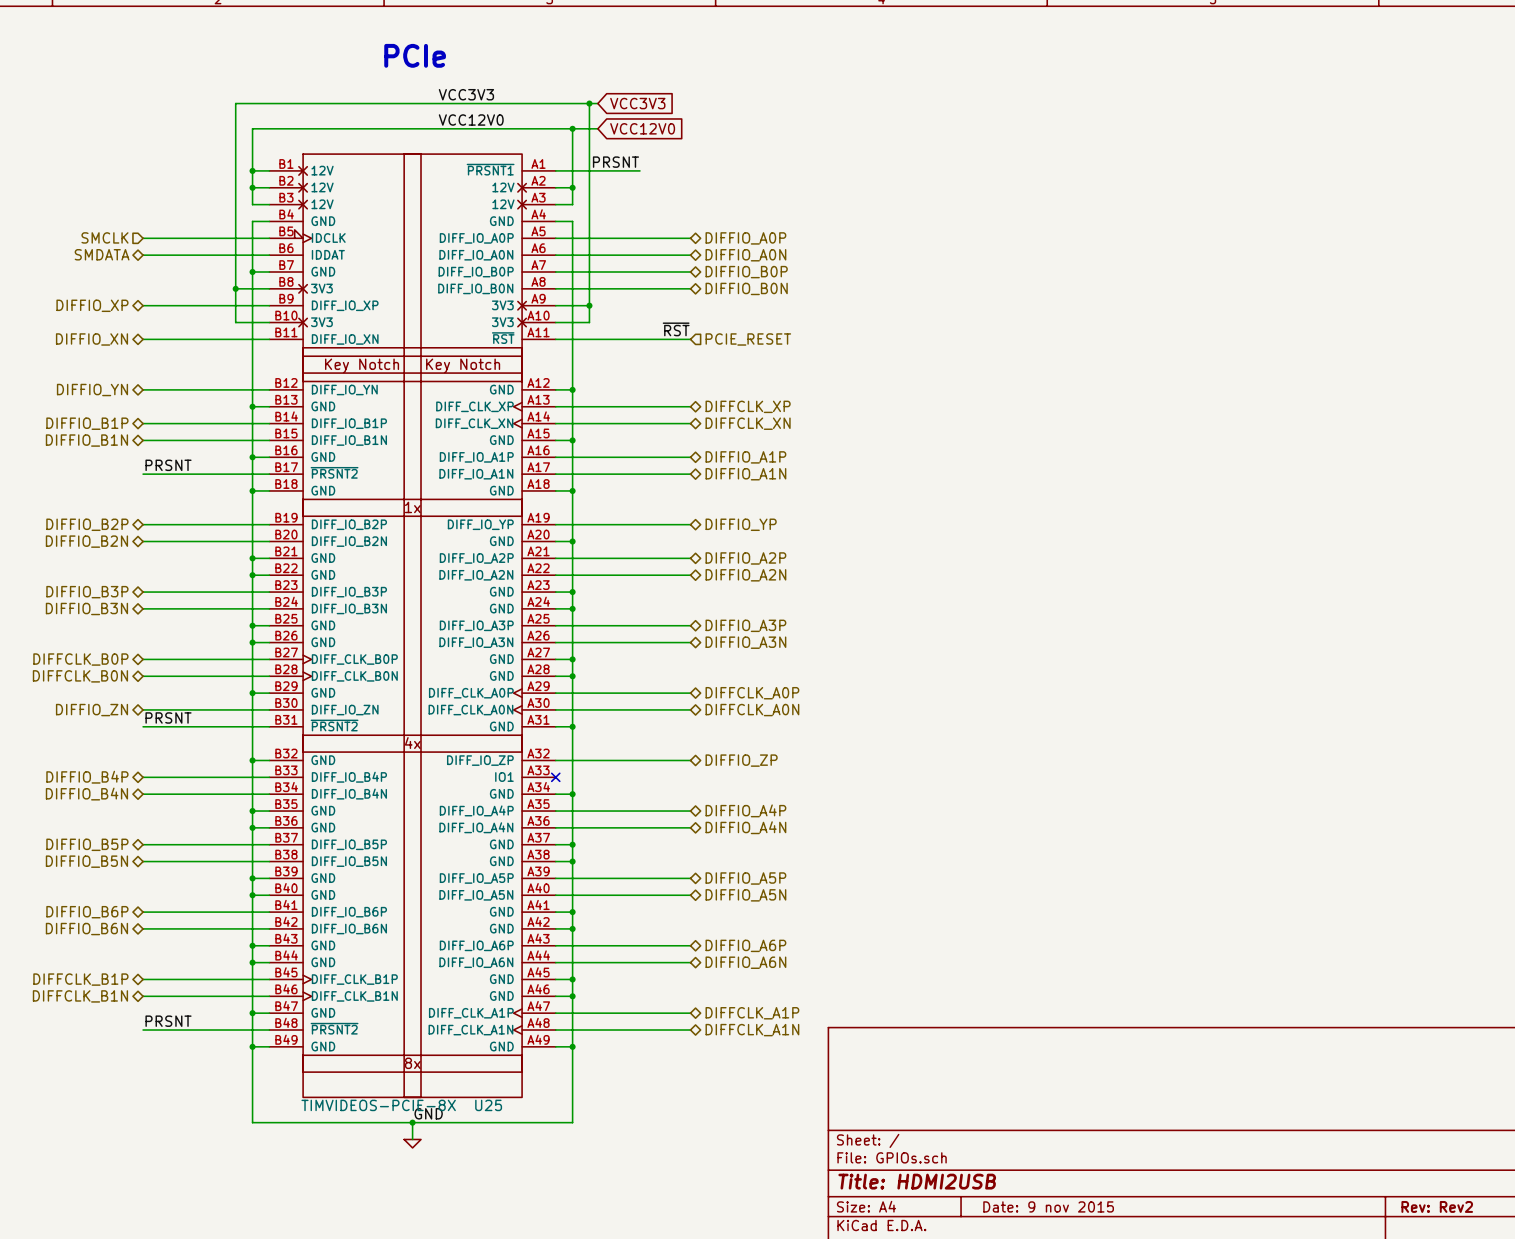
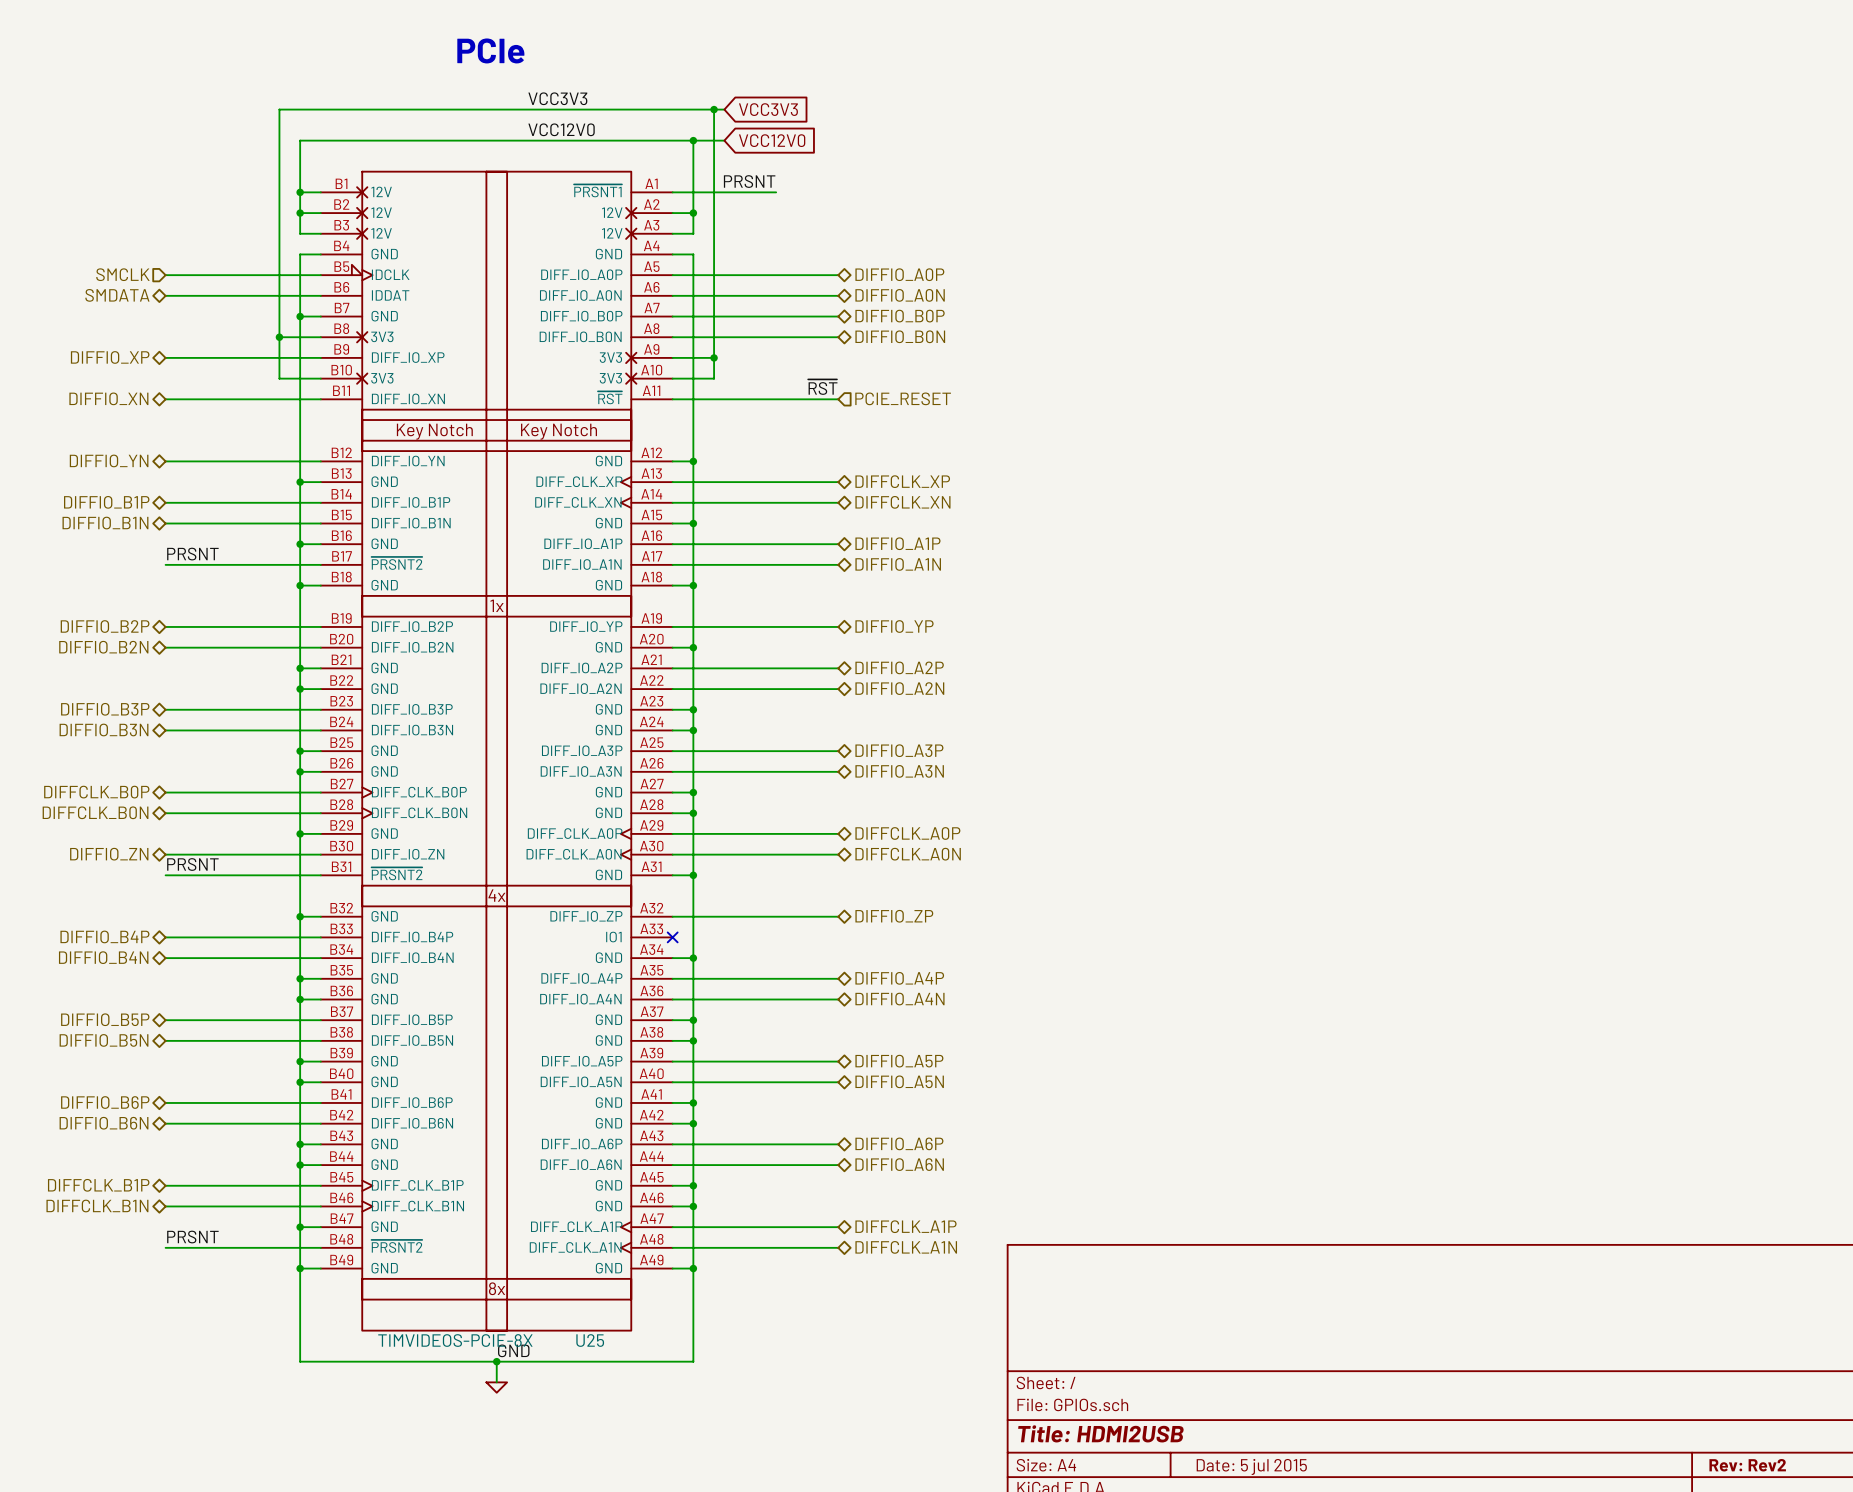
title block: Date: 9 nov 2015 (1048, 1206) -> Date: 5 jul 2015 (1251, 1466)

